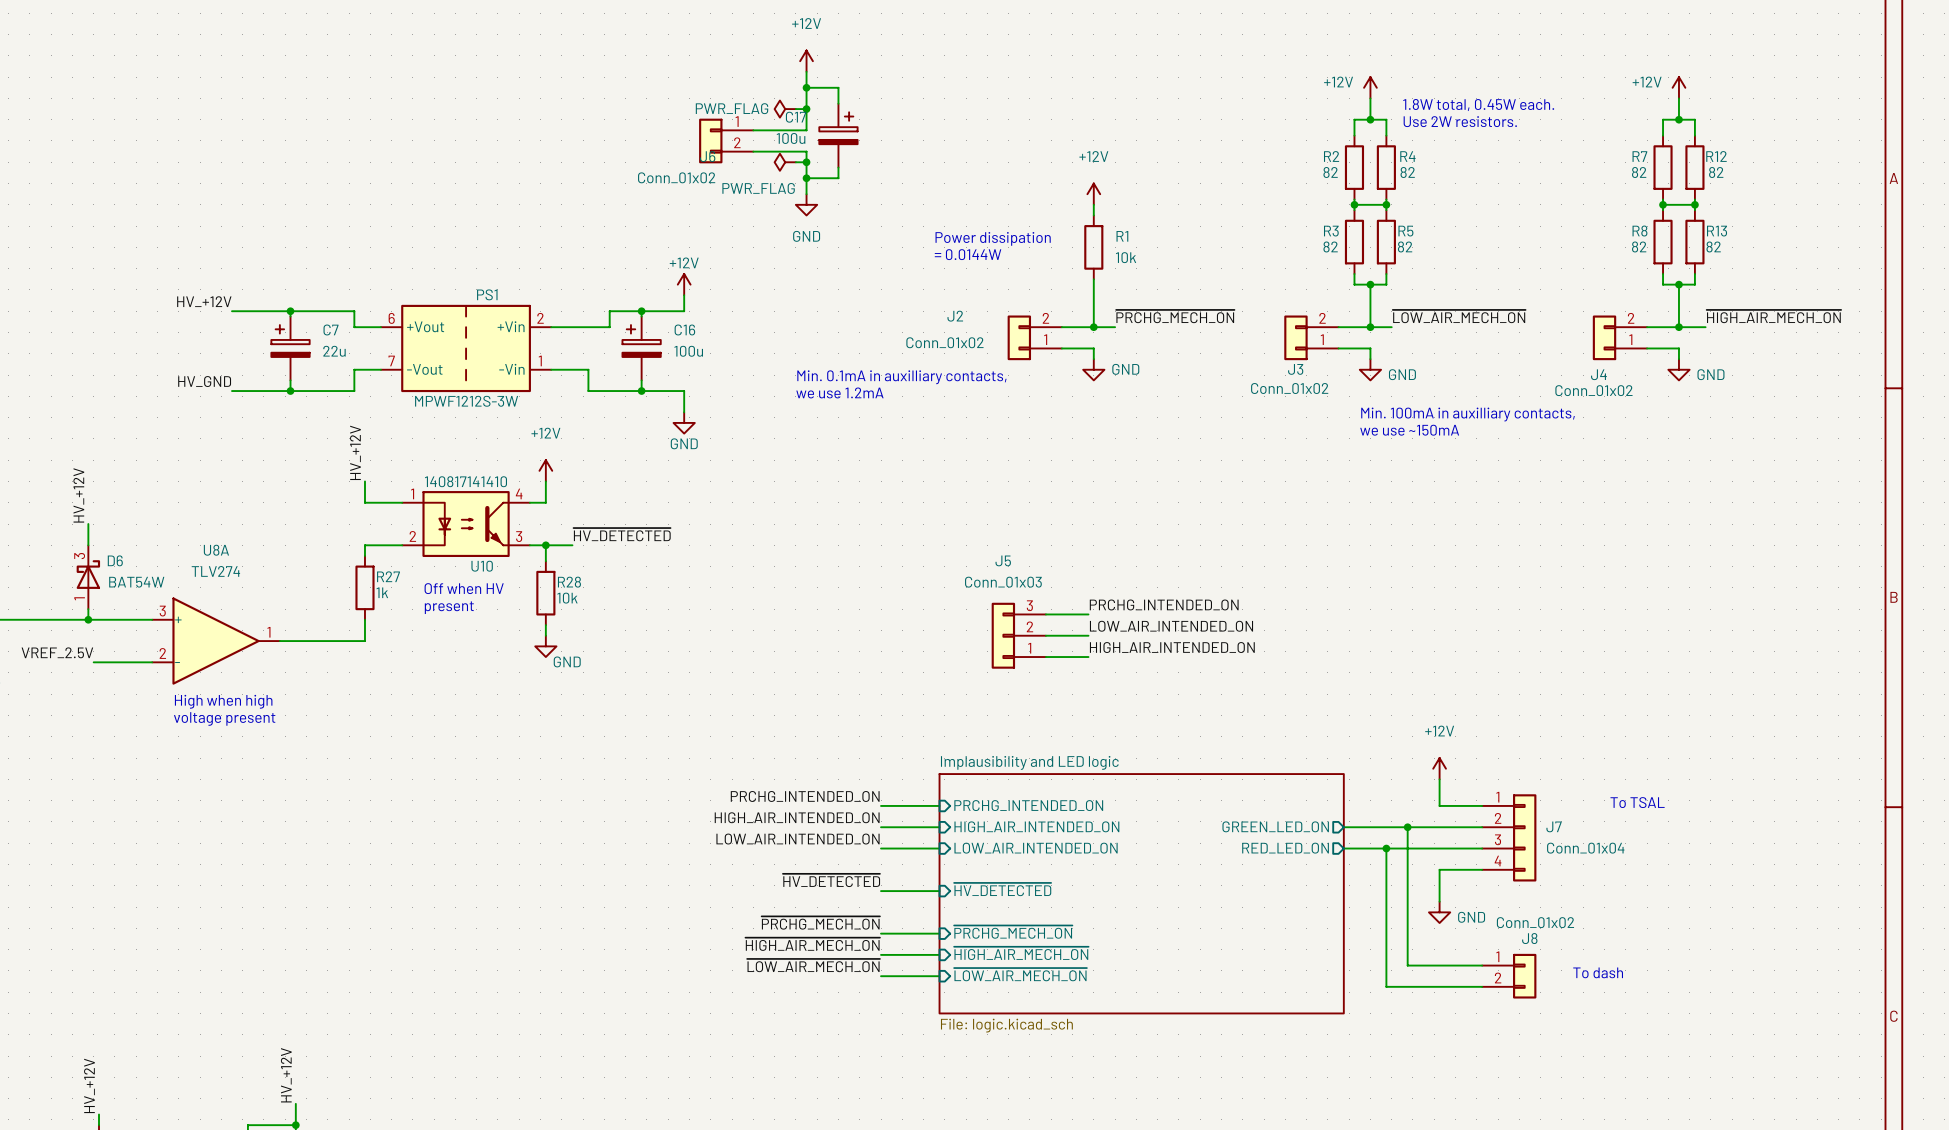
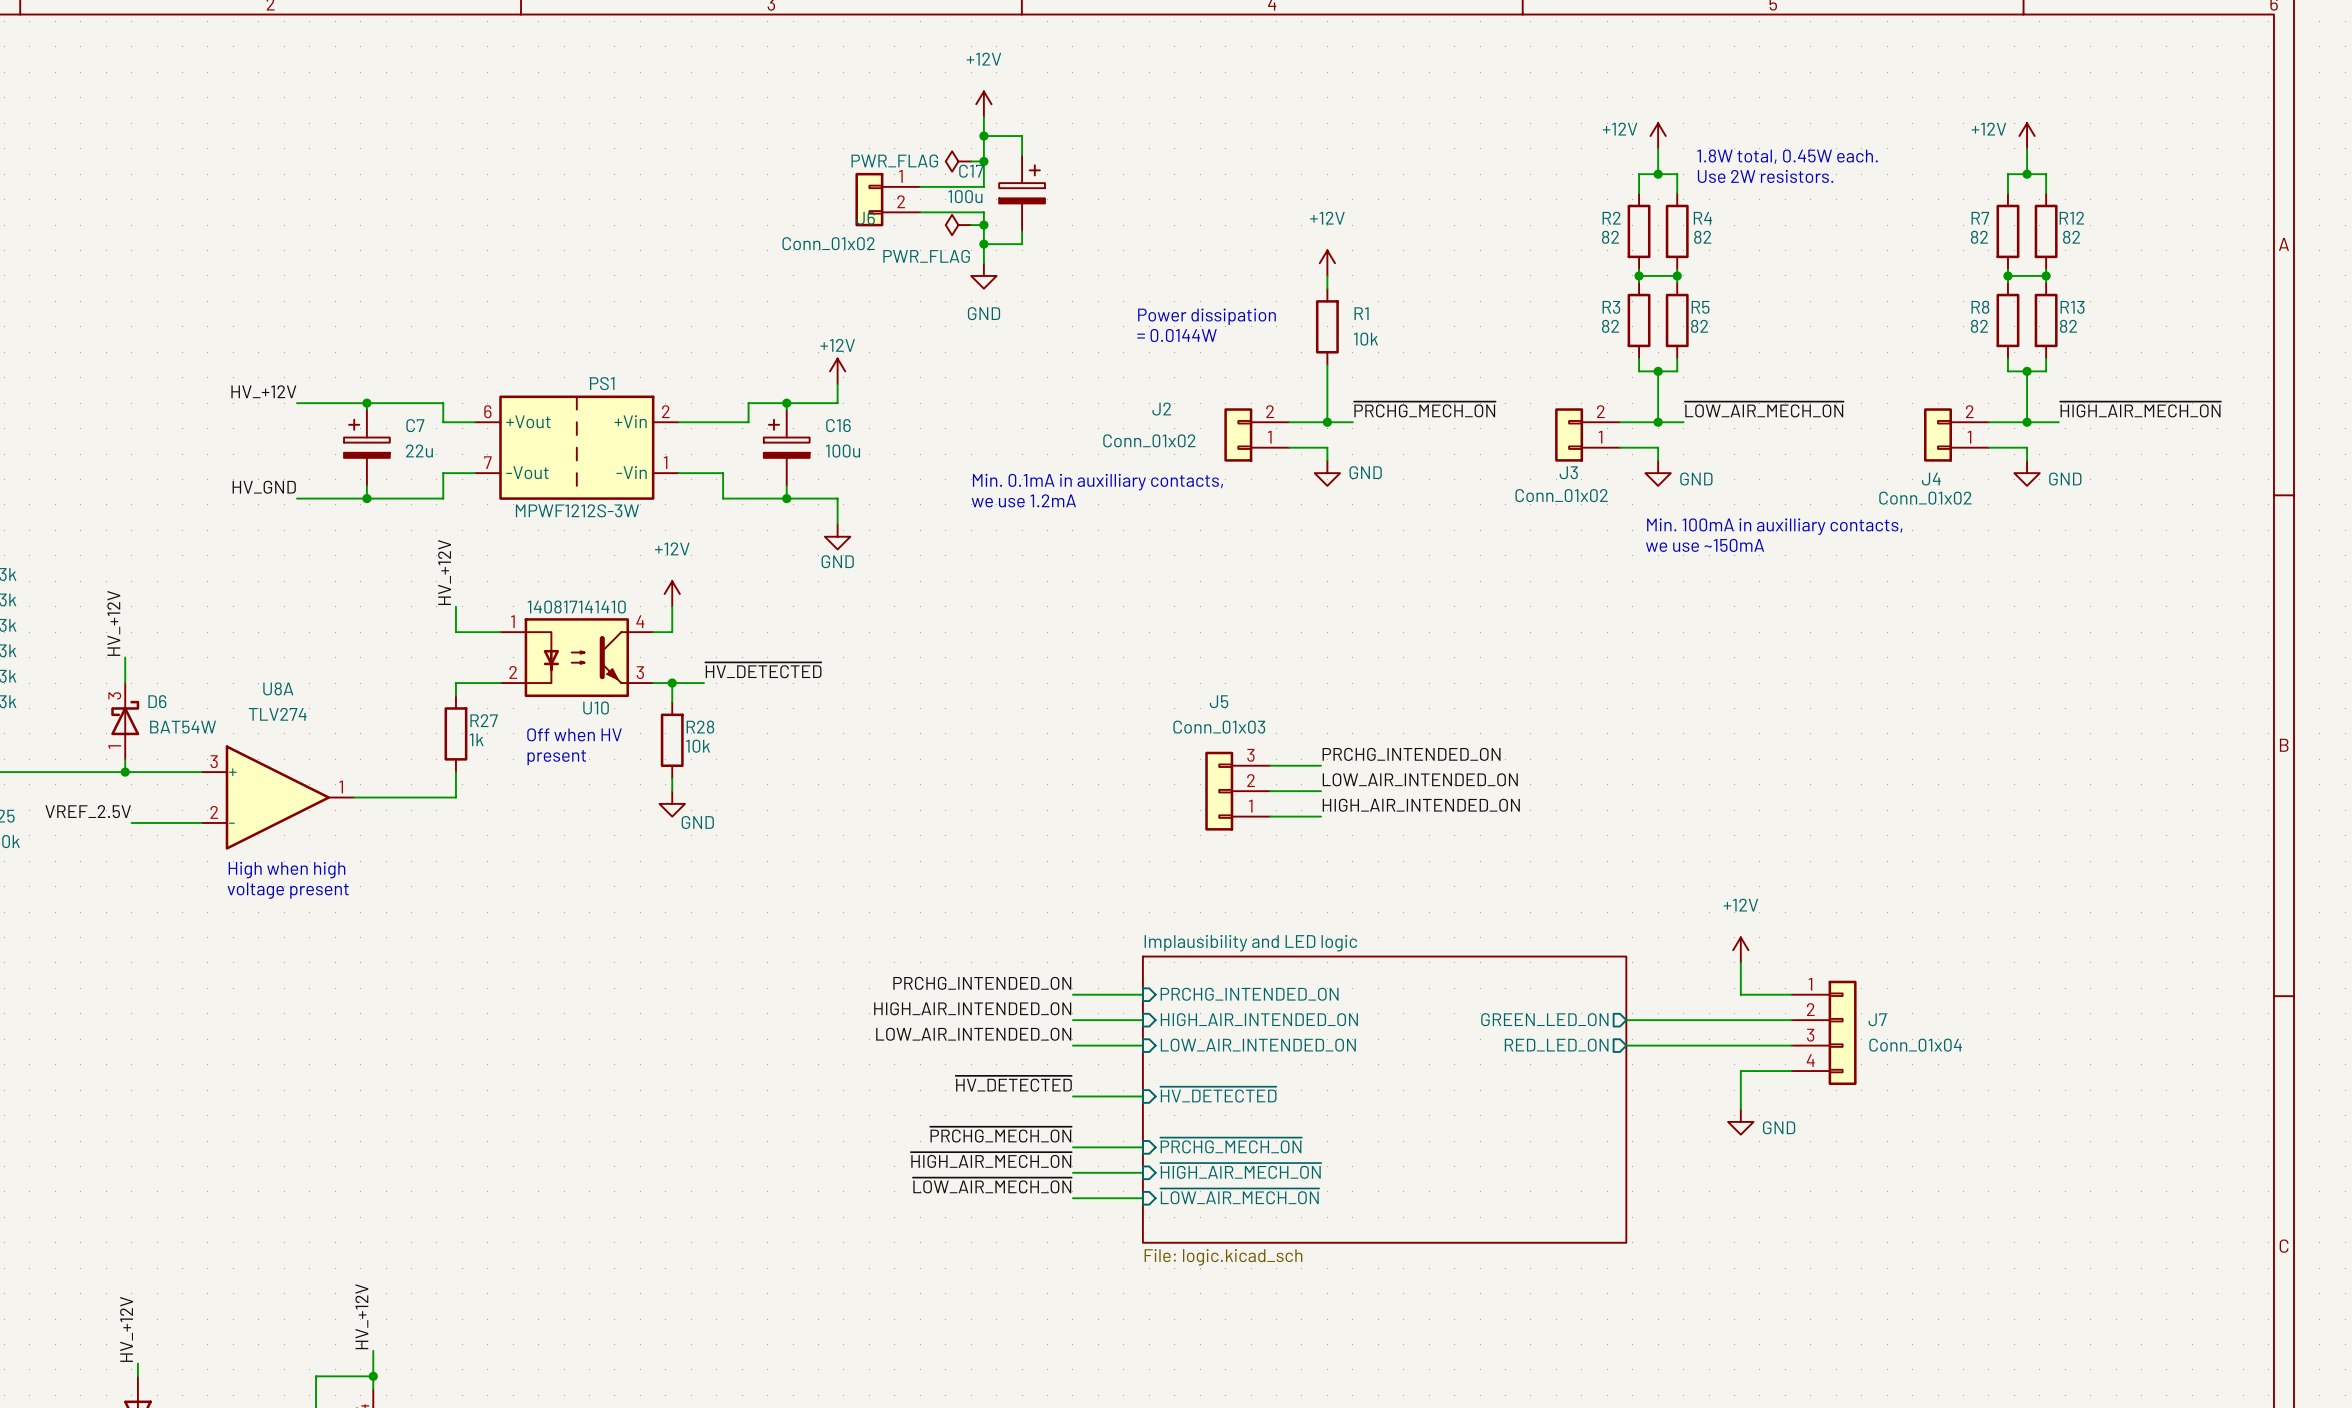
text: To TSAL (1637, 802) -> none
wire: (1407, 827) (1407, 965) (1482, 965) -> none
junction: (1407, 827) -> none
wire: (1386, 848) (1386, 986) (1482, 986) -> none
junction: (1386, 848) -> none
text: To dash (1598, 972) -> none
J8: Conn_01x02 (1509, 976) -> none

